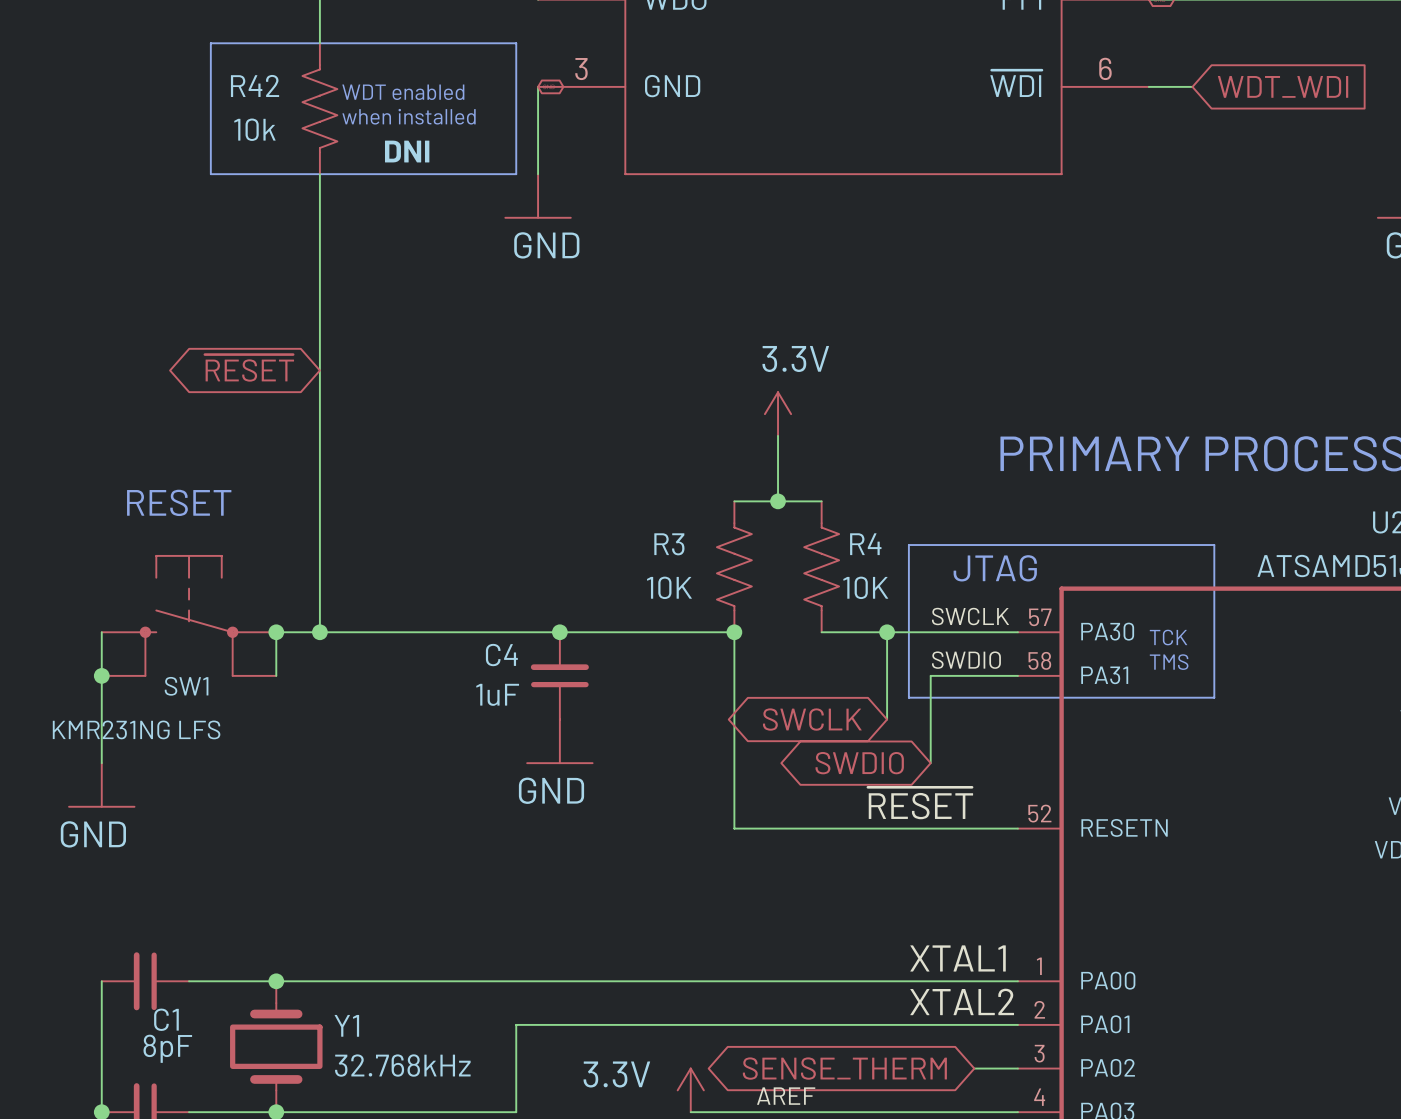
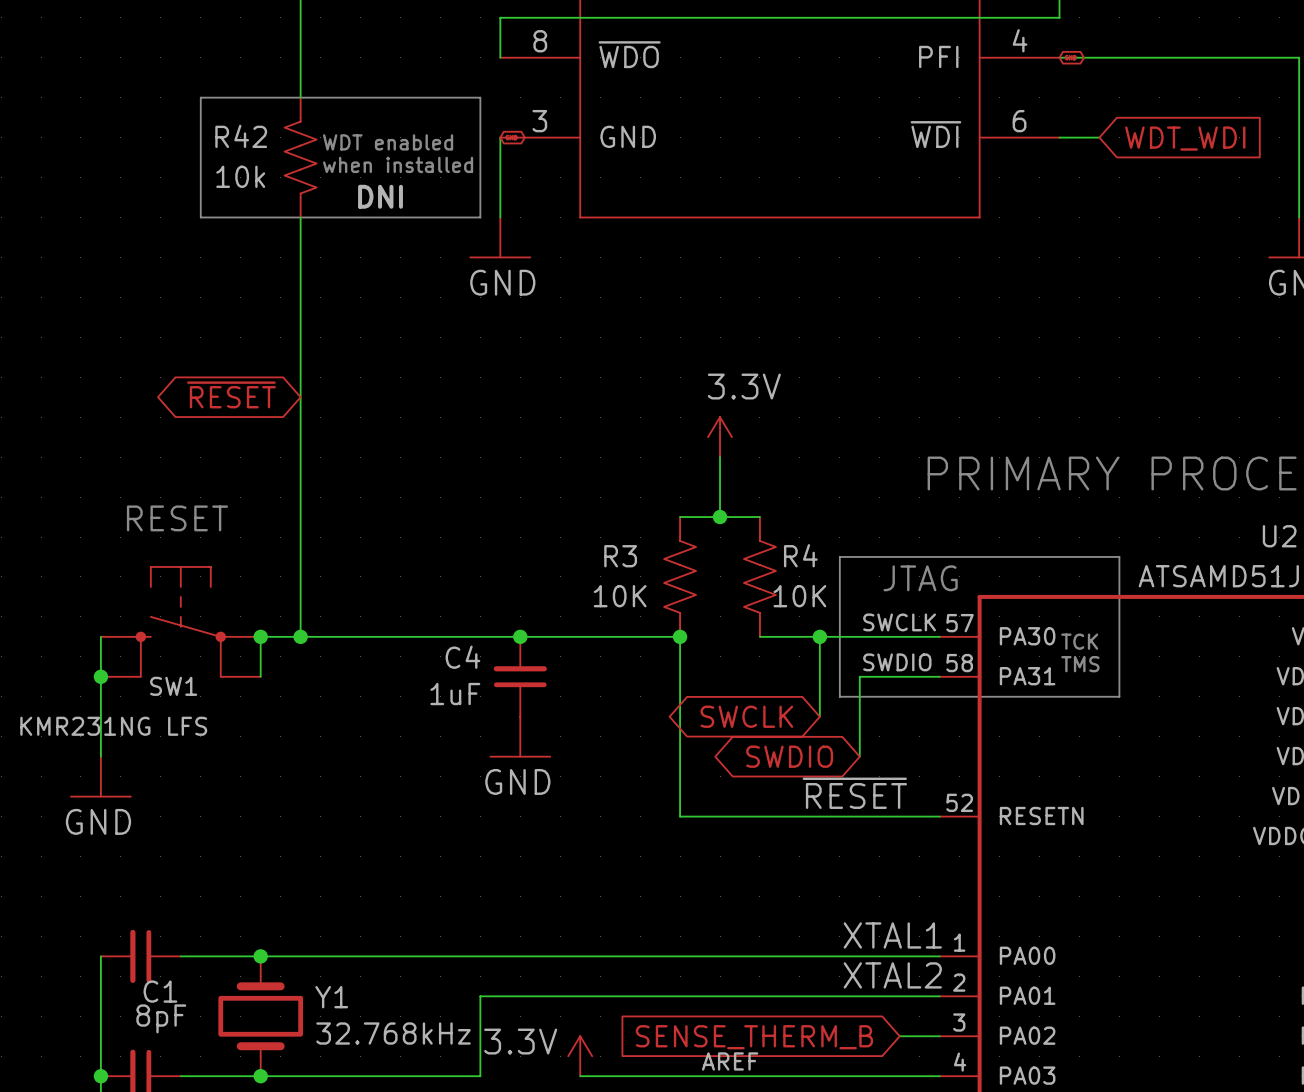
global label shape: bidirectional (844, 1068) -> input (754, 1037)
global label: SENSE_THERM (844, 1068) -> SENSE_THERM_B (754, 1037)
power symbol position: 3.3V (690, 1090) -> 3.3V (580, 1056)
wire: none -> (580, 1076) (640, 1076)

